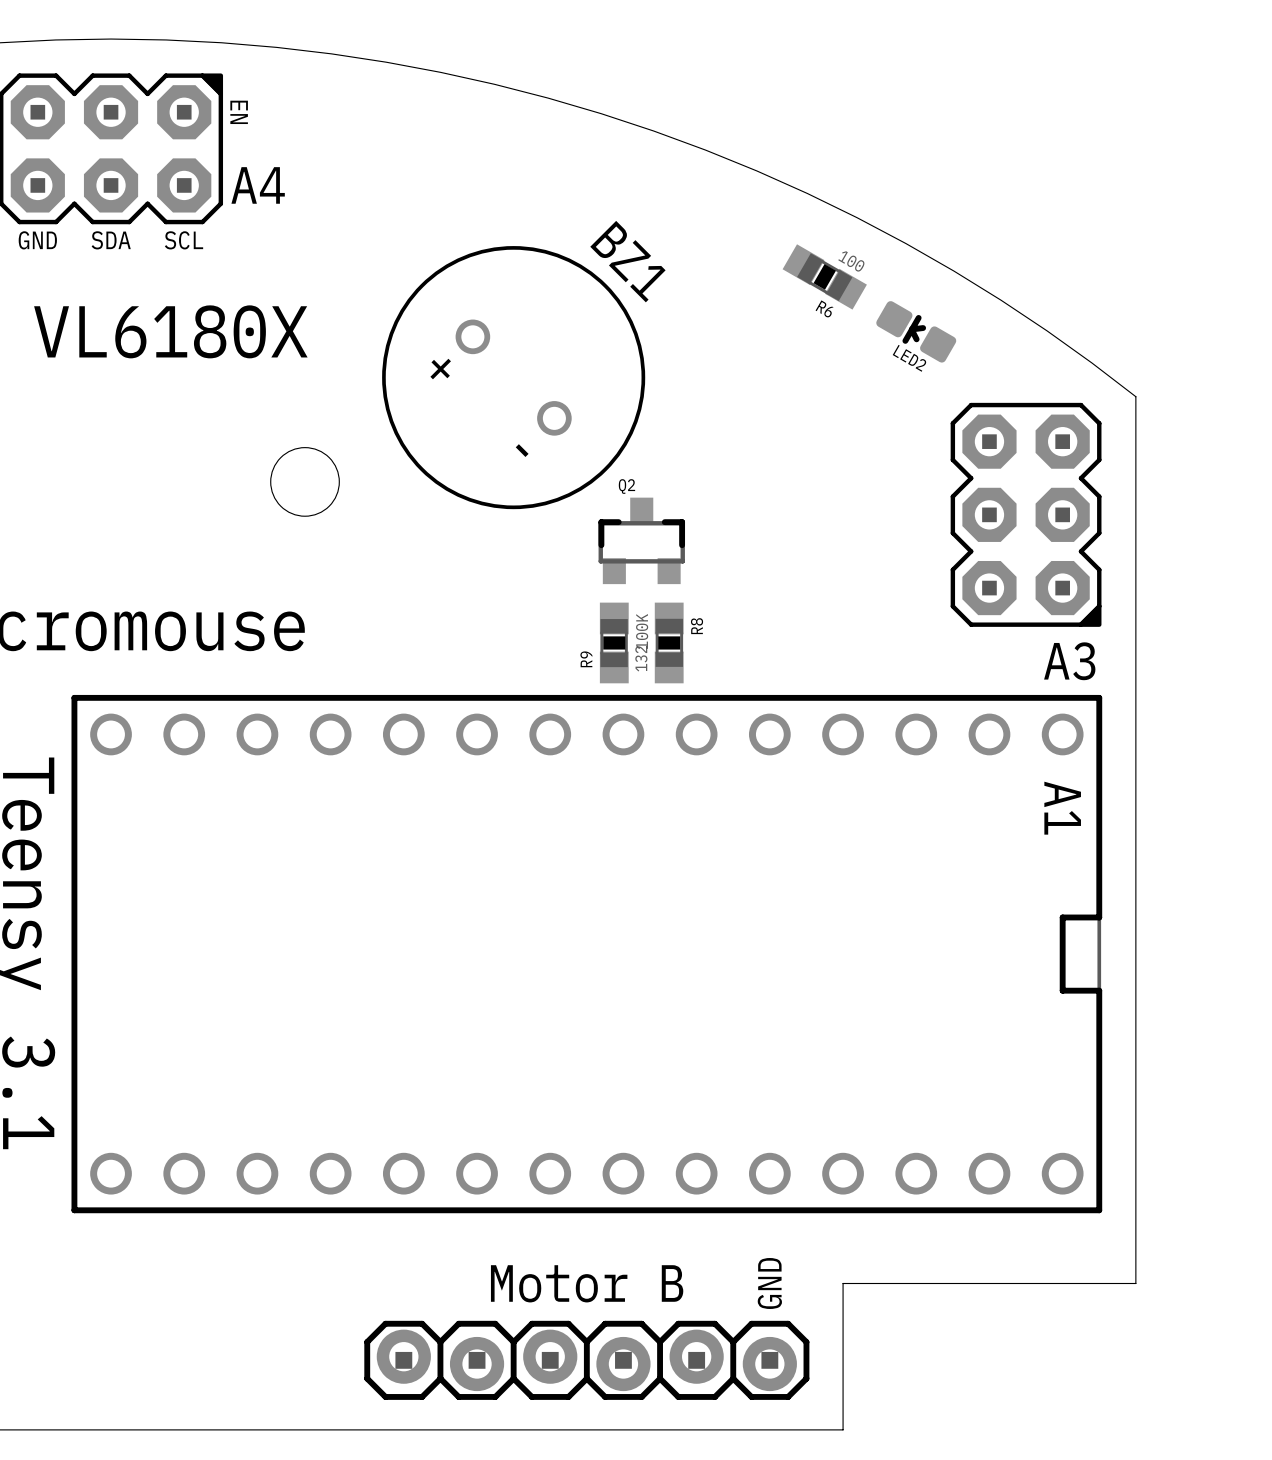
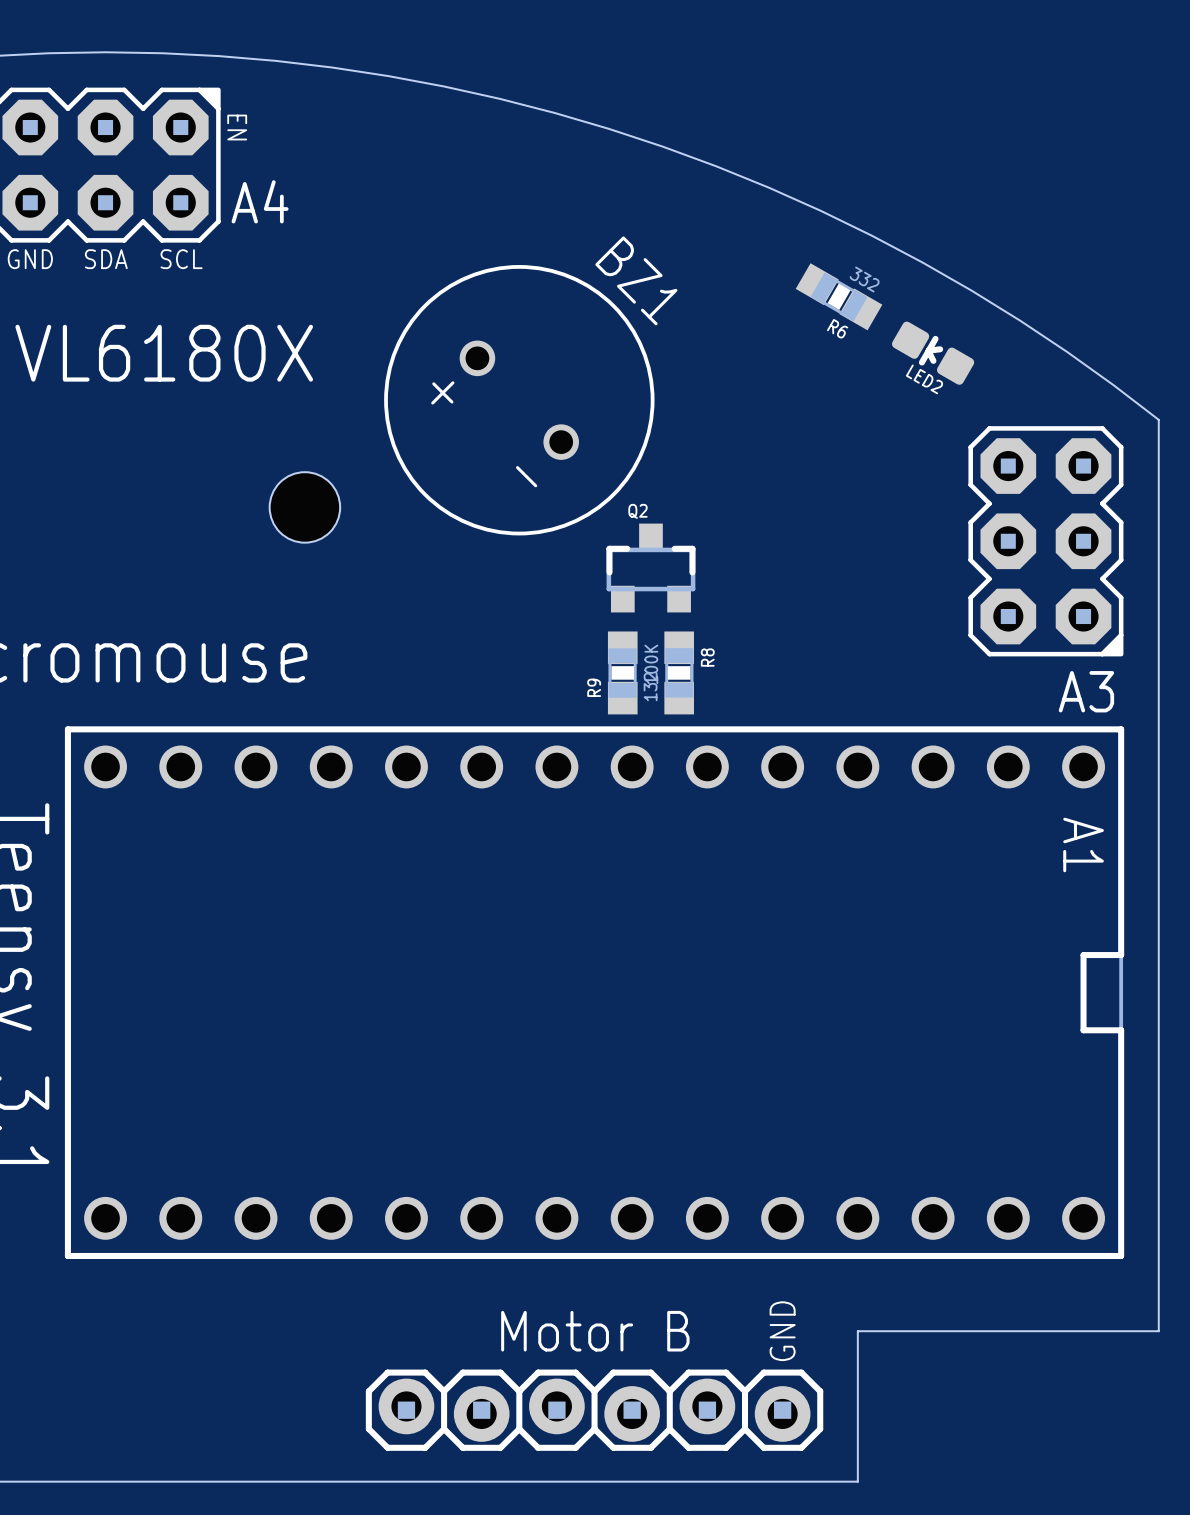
R6 value: 100 (851, 261) -> 332 (864, 279)

